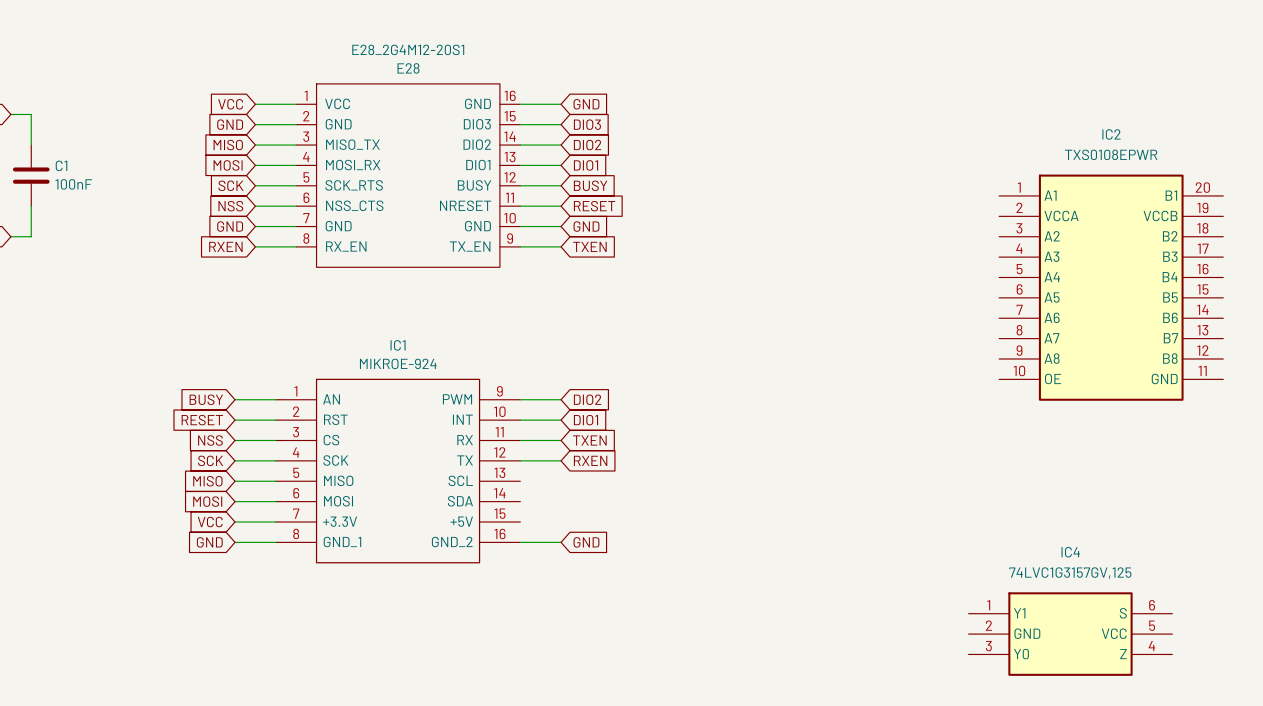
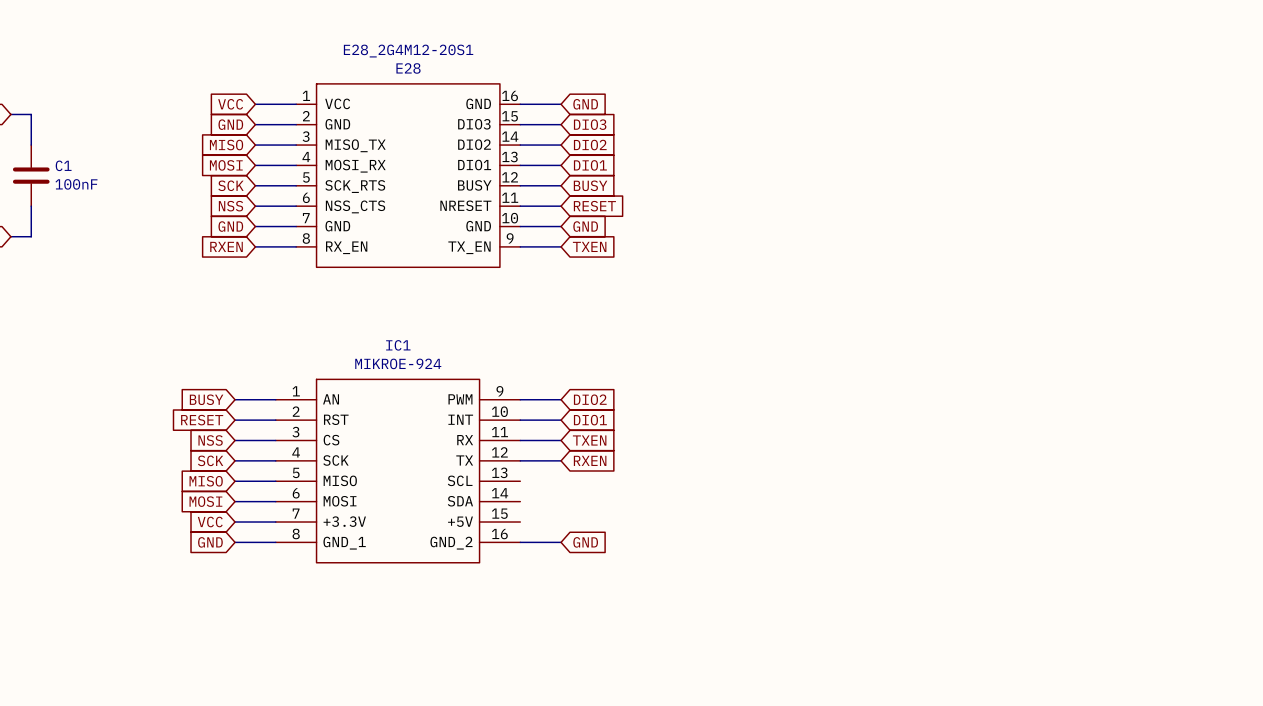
IC2: TXS0108EPWR (1111, 287) -> none
IC4: 74LVC1G3157GV,125 (1070, 634) -> none

